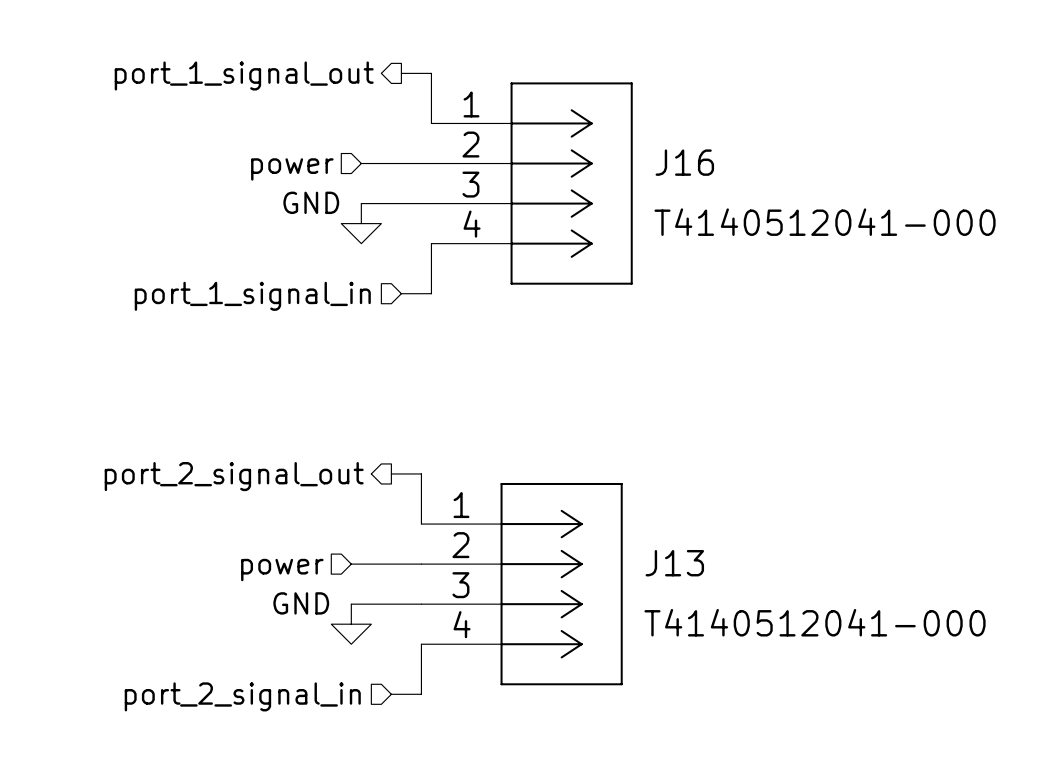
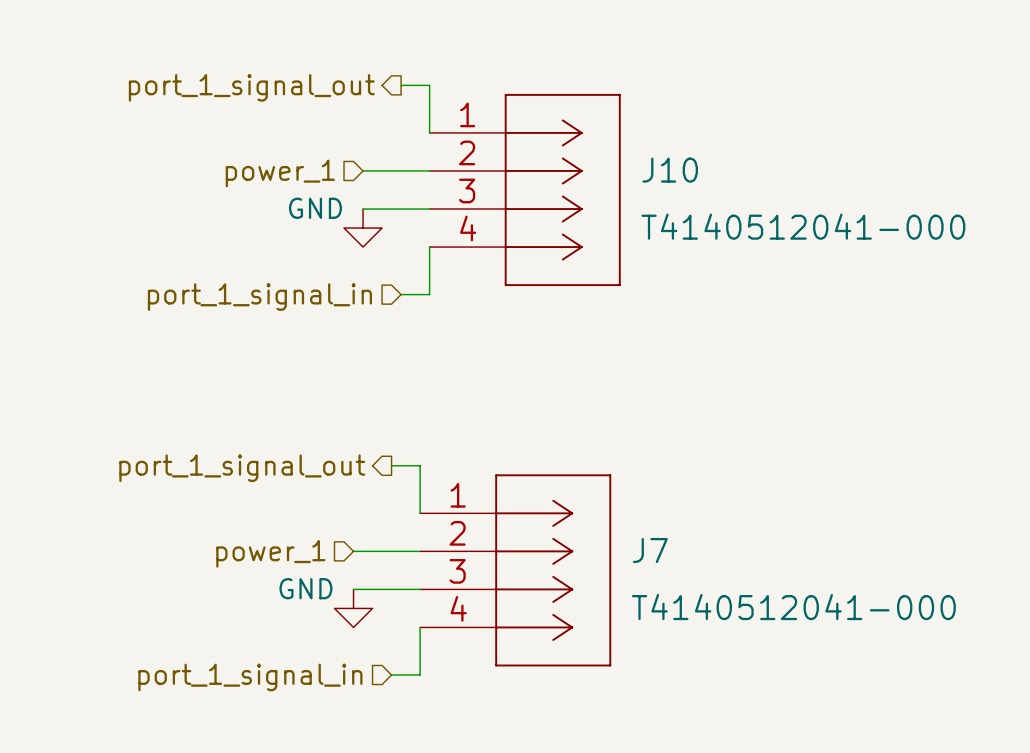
J16 name: J16 (684, 162) -> J10 (670, 170)
hierarchical label: power (292, 169) -> power_1 (280, 173)
hierarchical label: port_2_signal_out (234, 476) -> port_1_signal_out (242, 468)
J13 name: J13 (674, 563) -> J7 (650, 550)
hierarchical label: power (282, 570) -> power_1 (270, 553)
hierarchical label: port_2_signal_in (242, 696) -> port_1_signal_in (250, 677)

